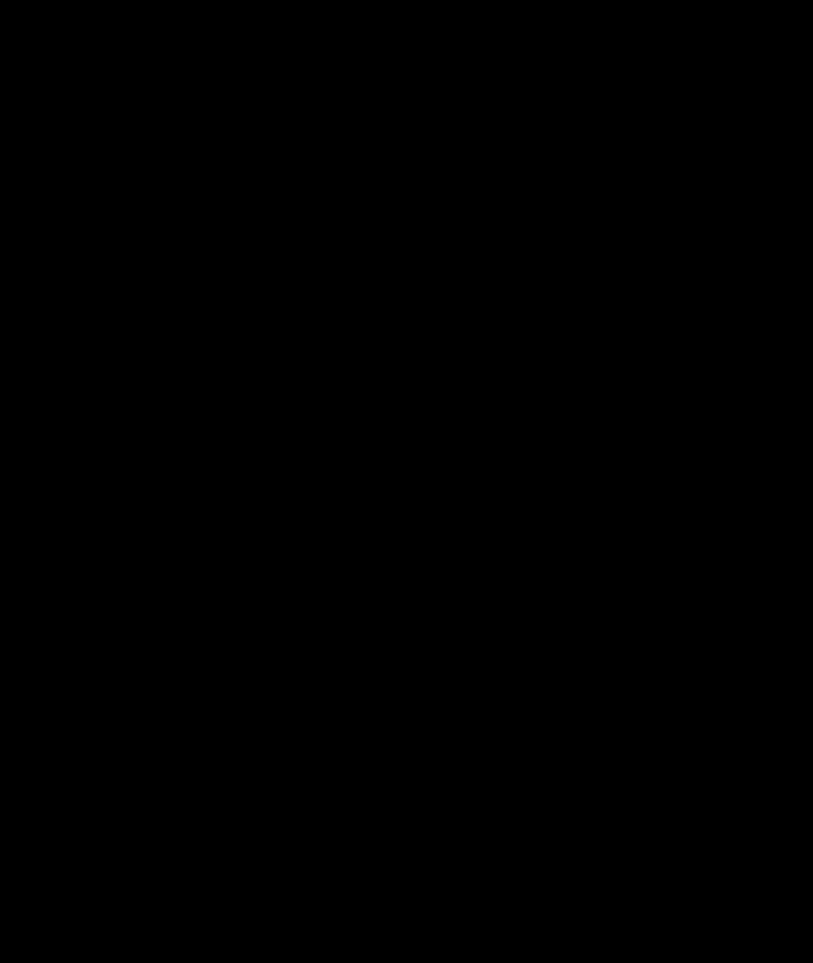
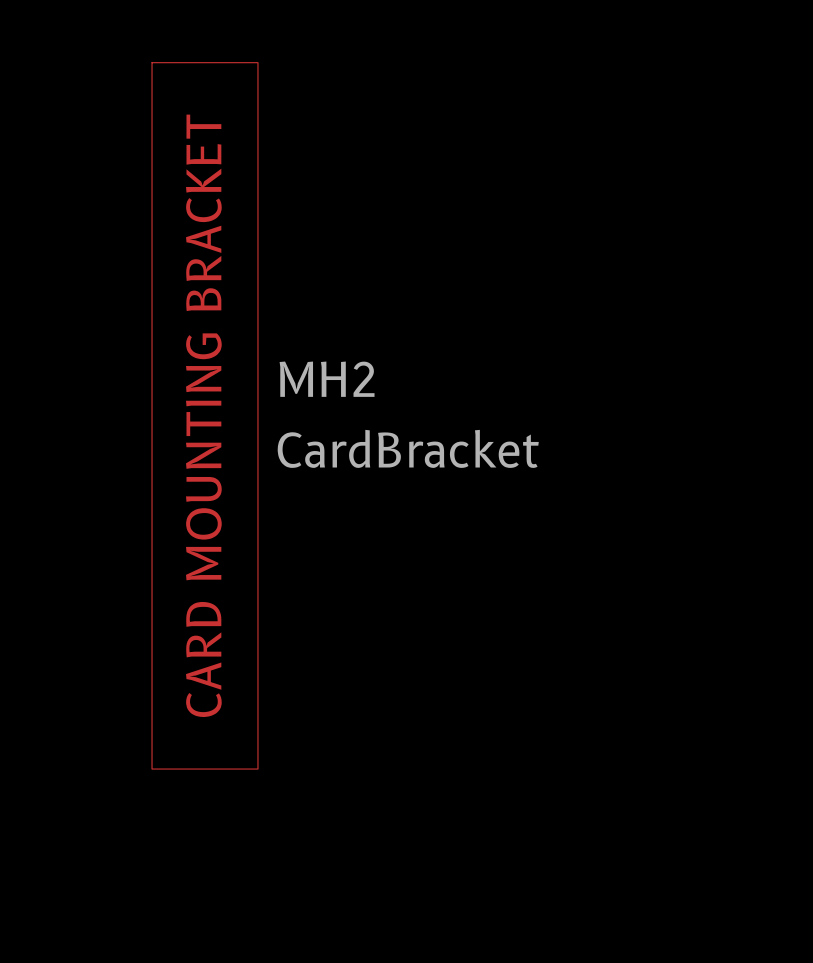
MH2: none -> CardBracket (204, 415)

